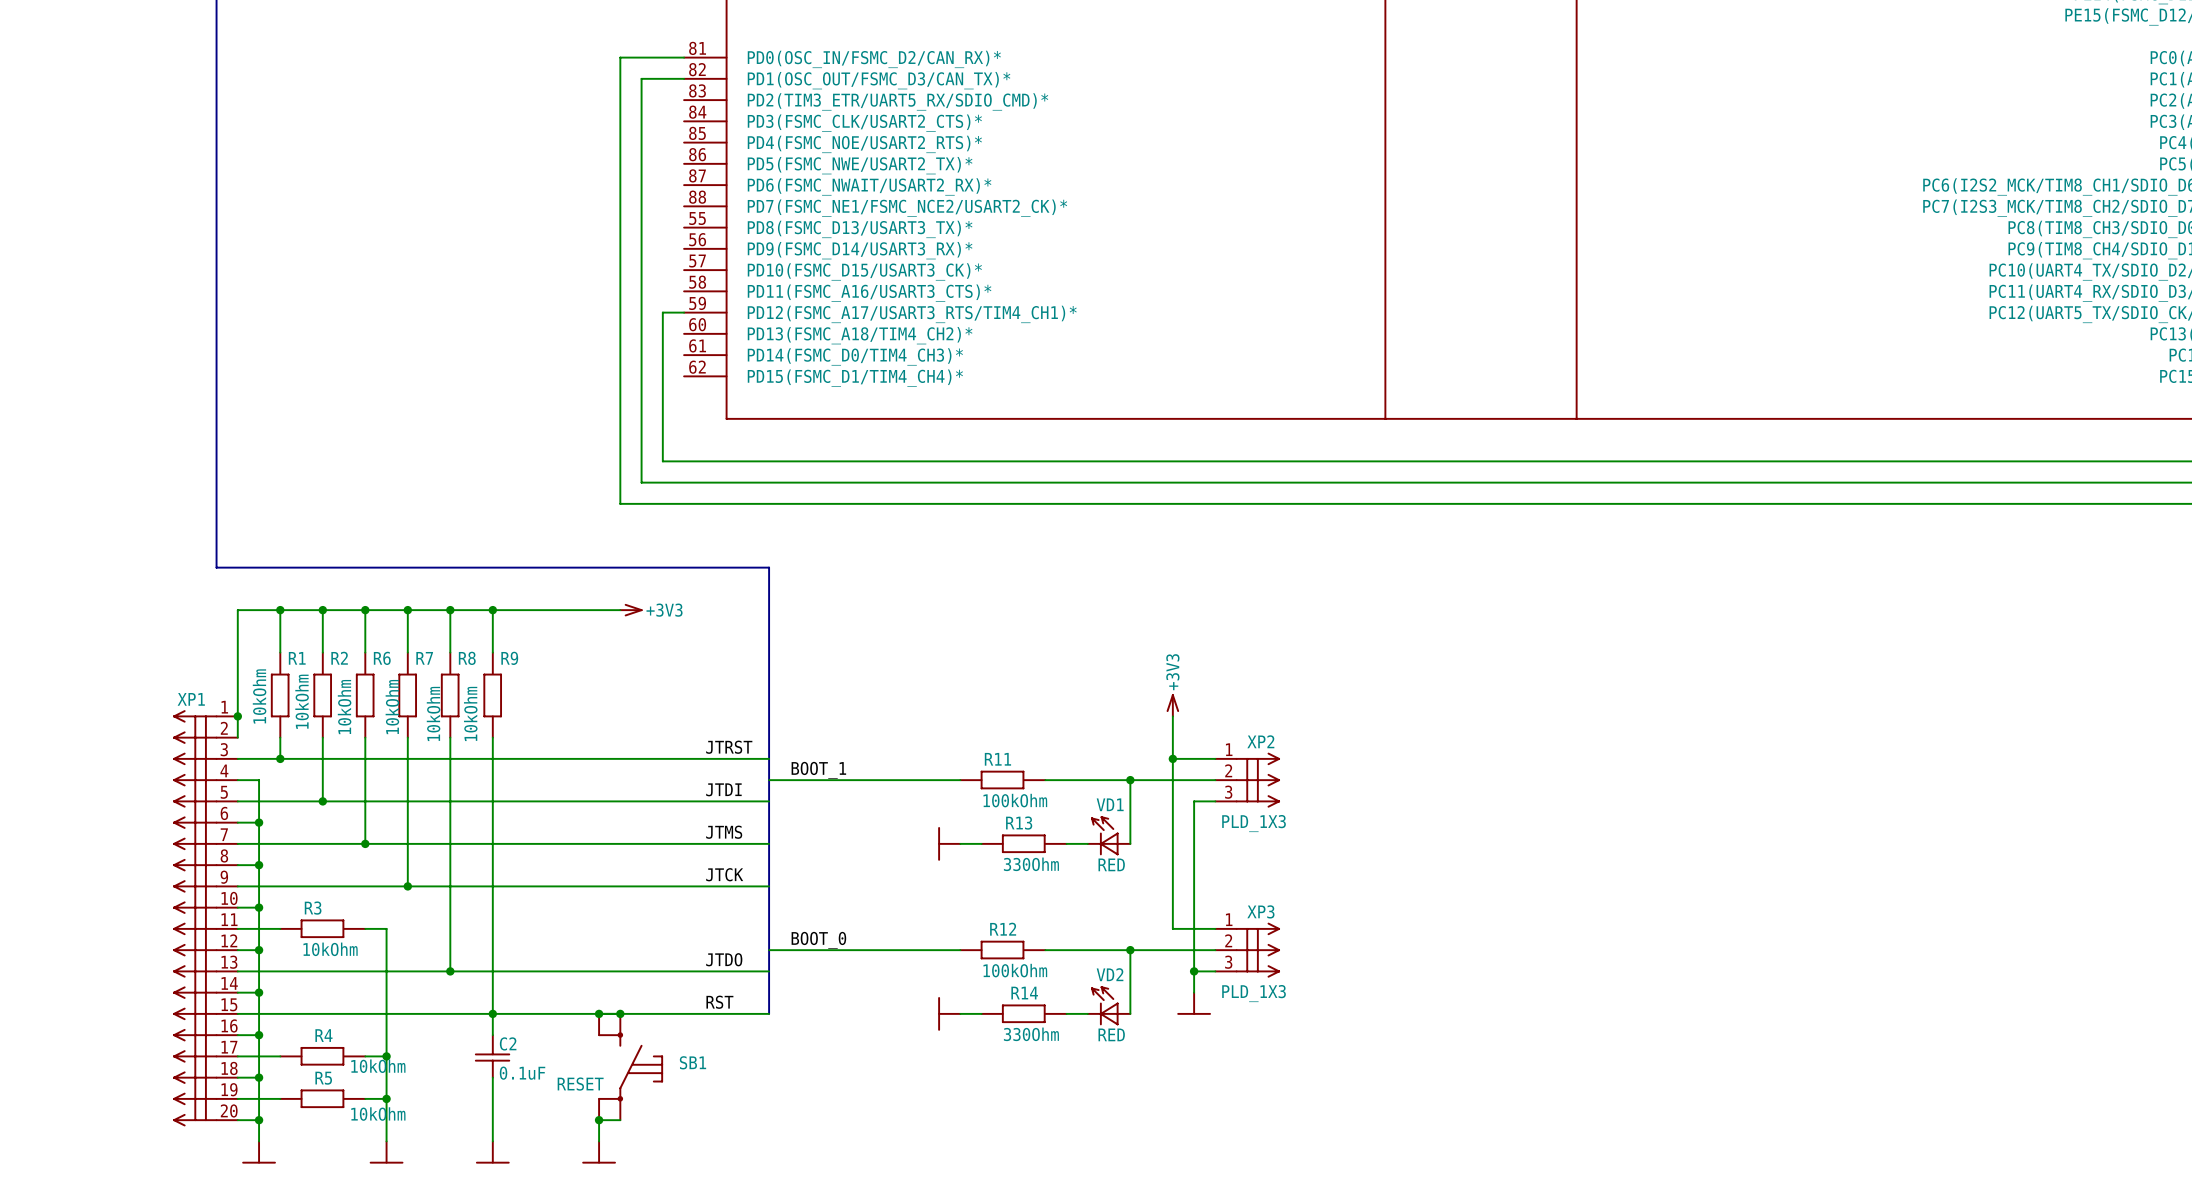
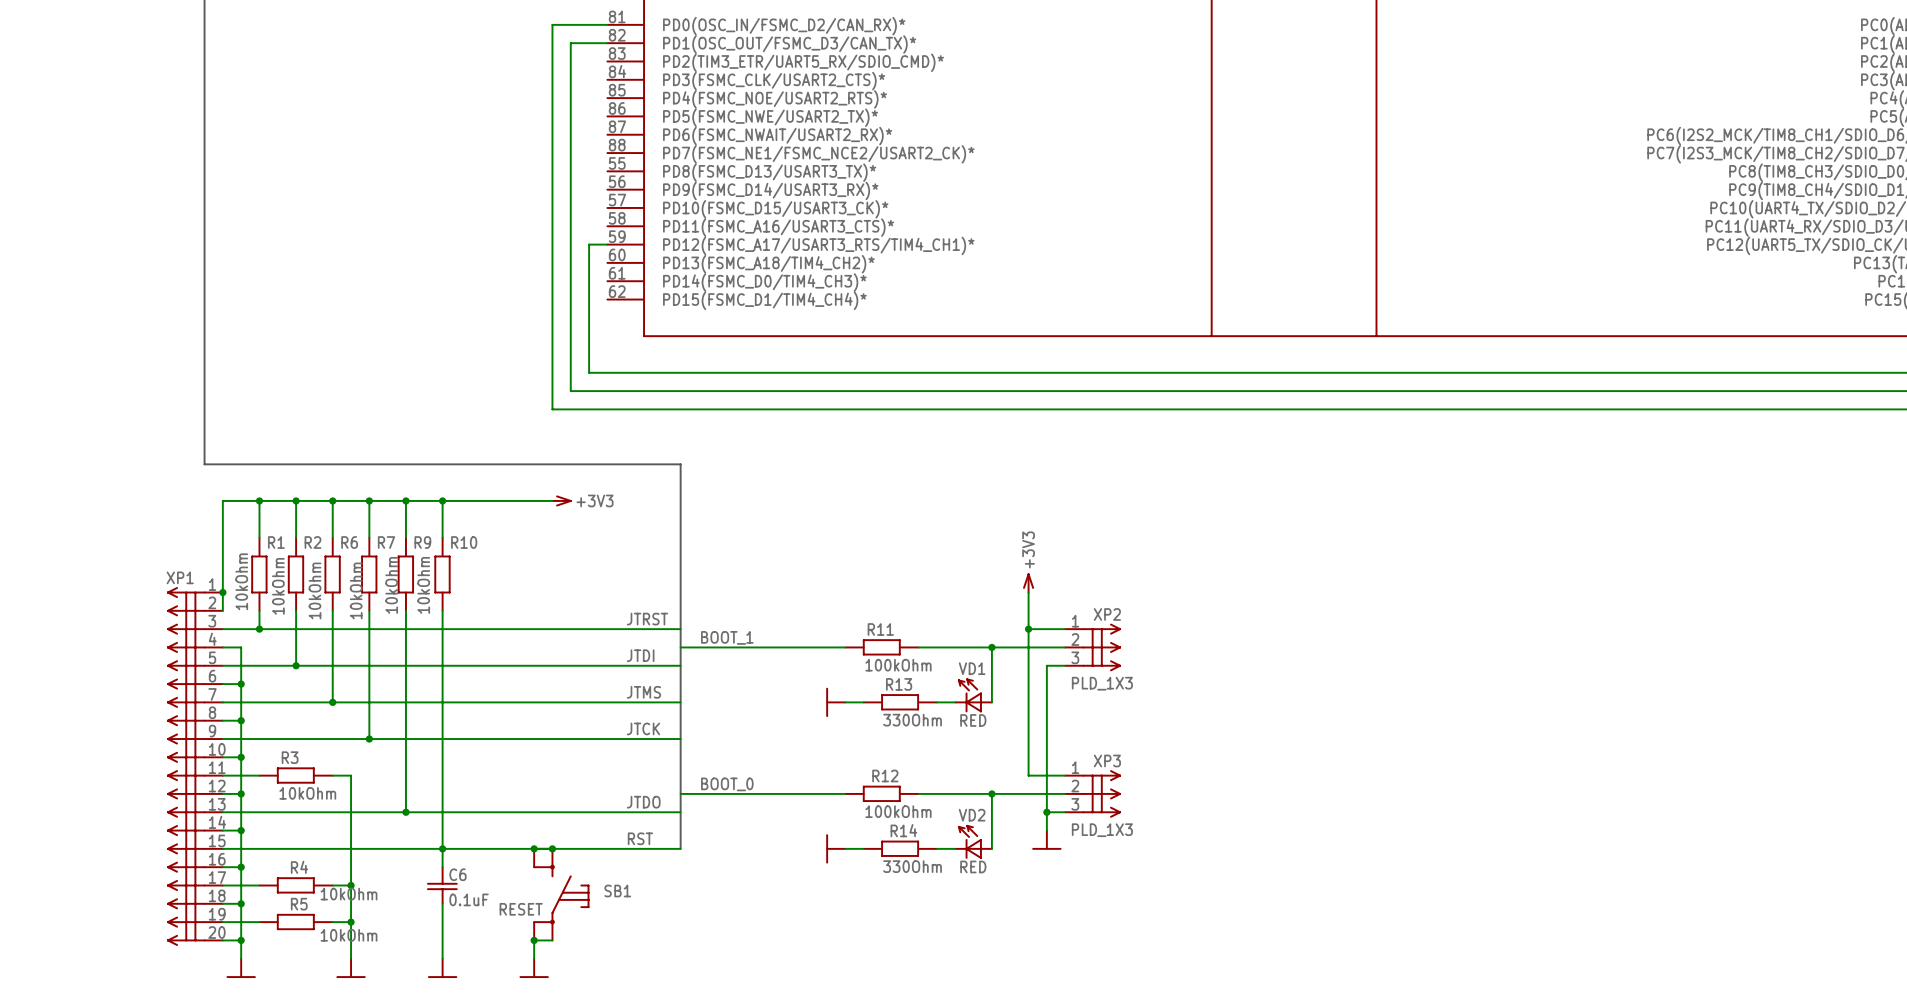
R8 name: R8 (467, 658) -> R9 (422, 542)
R9 name: R9 (509, 658) -> R10 (464, 542)
C2 name: C2 (508, 1043) -> C6 (457, 874)

